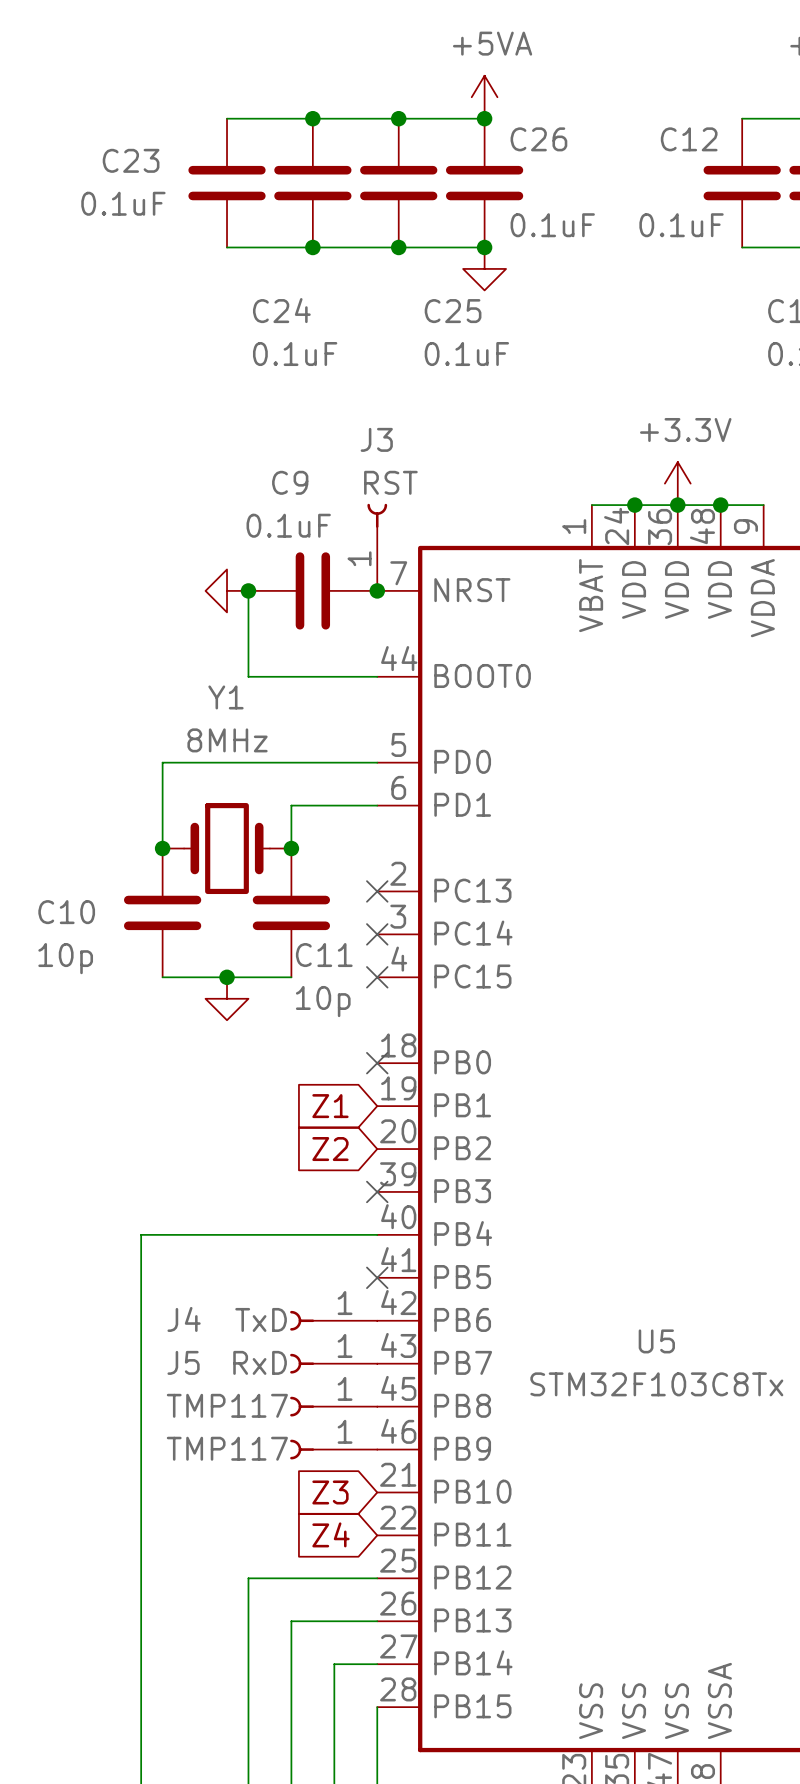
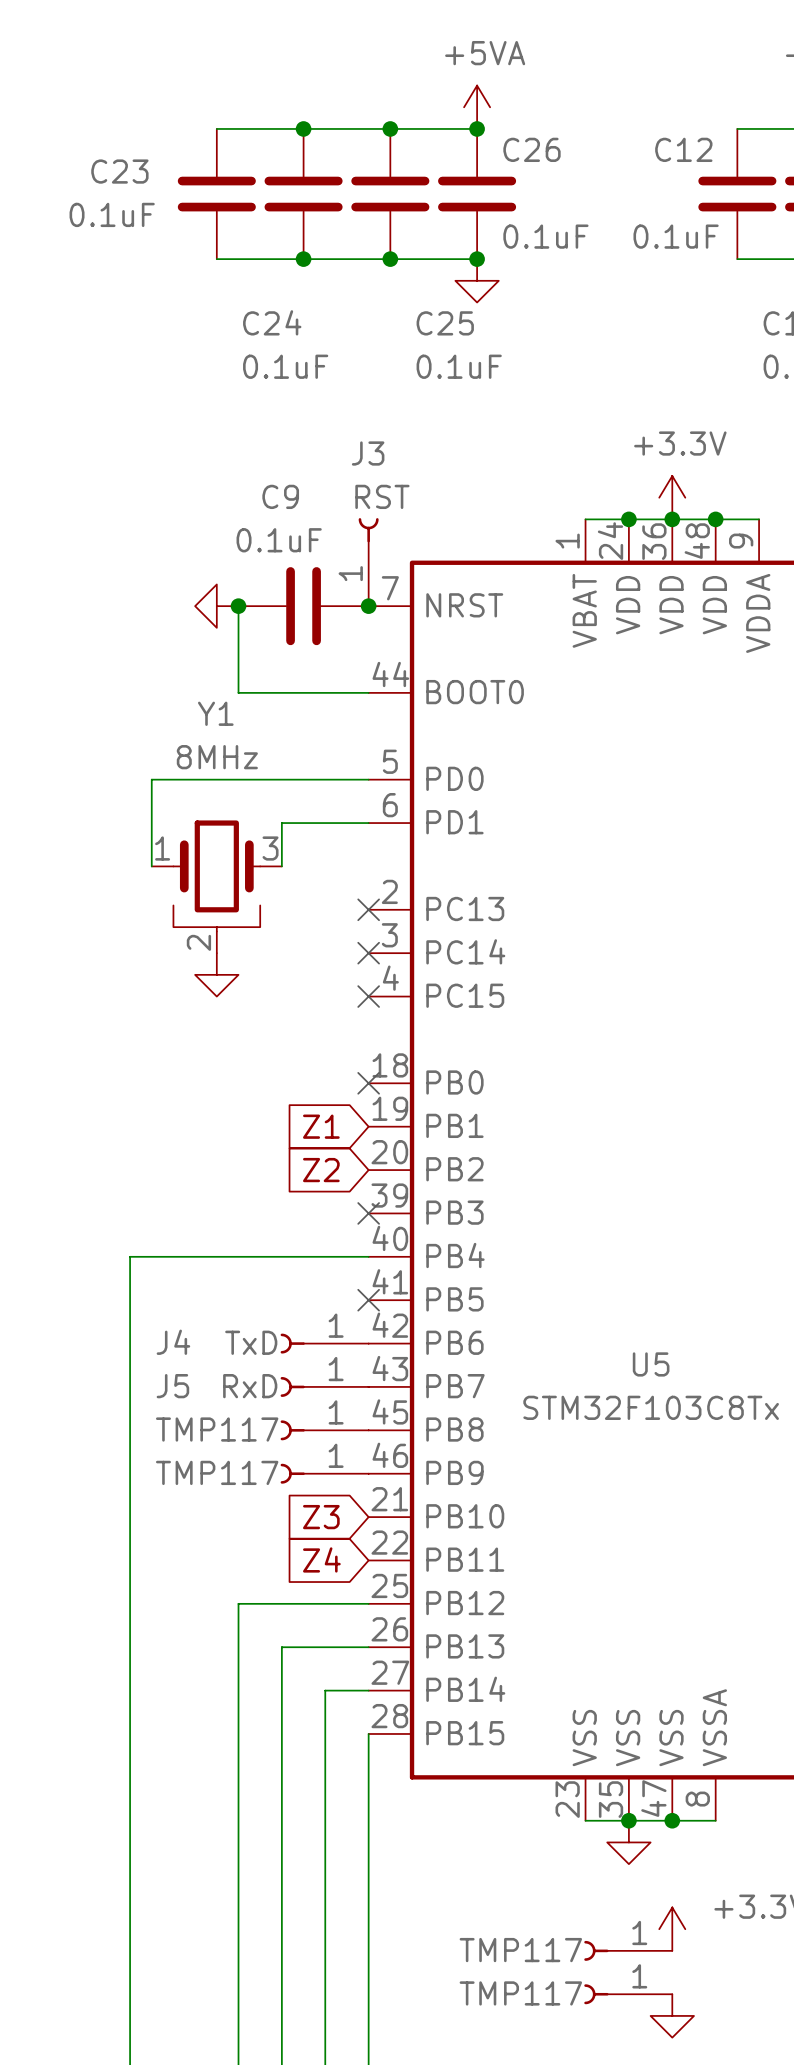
Y1 symbol: [162, 803, 292, 895] -> [151, 820, 282, 954]
junction: (162, 848) -> none
junction: (291, 848) -> none
C10: 10p (162, 912) -> none
C11: 10p (291, 912) -> none
wire: (162, 977) (291, 977) -> none
junction: (227, 977) -> none
power symbol position: (227, 998) -> (216, 974)

